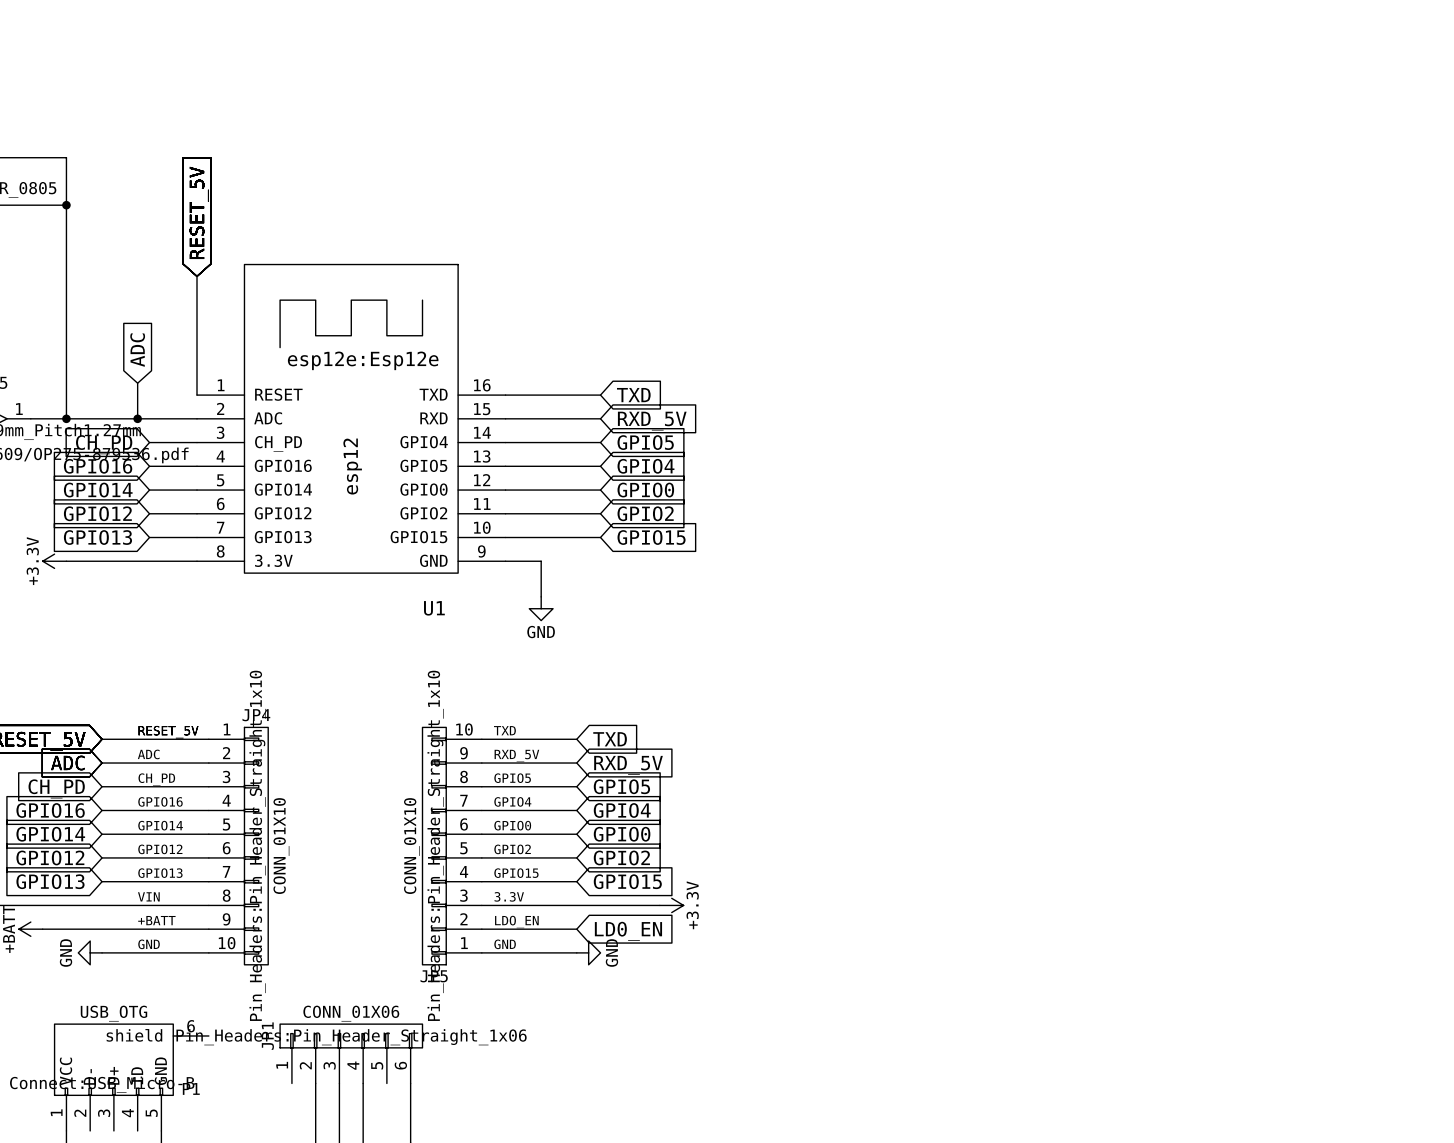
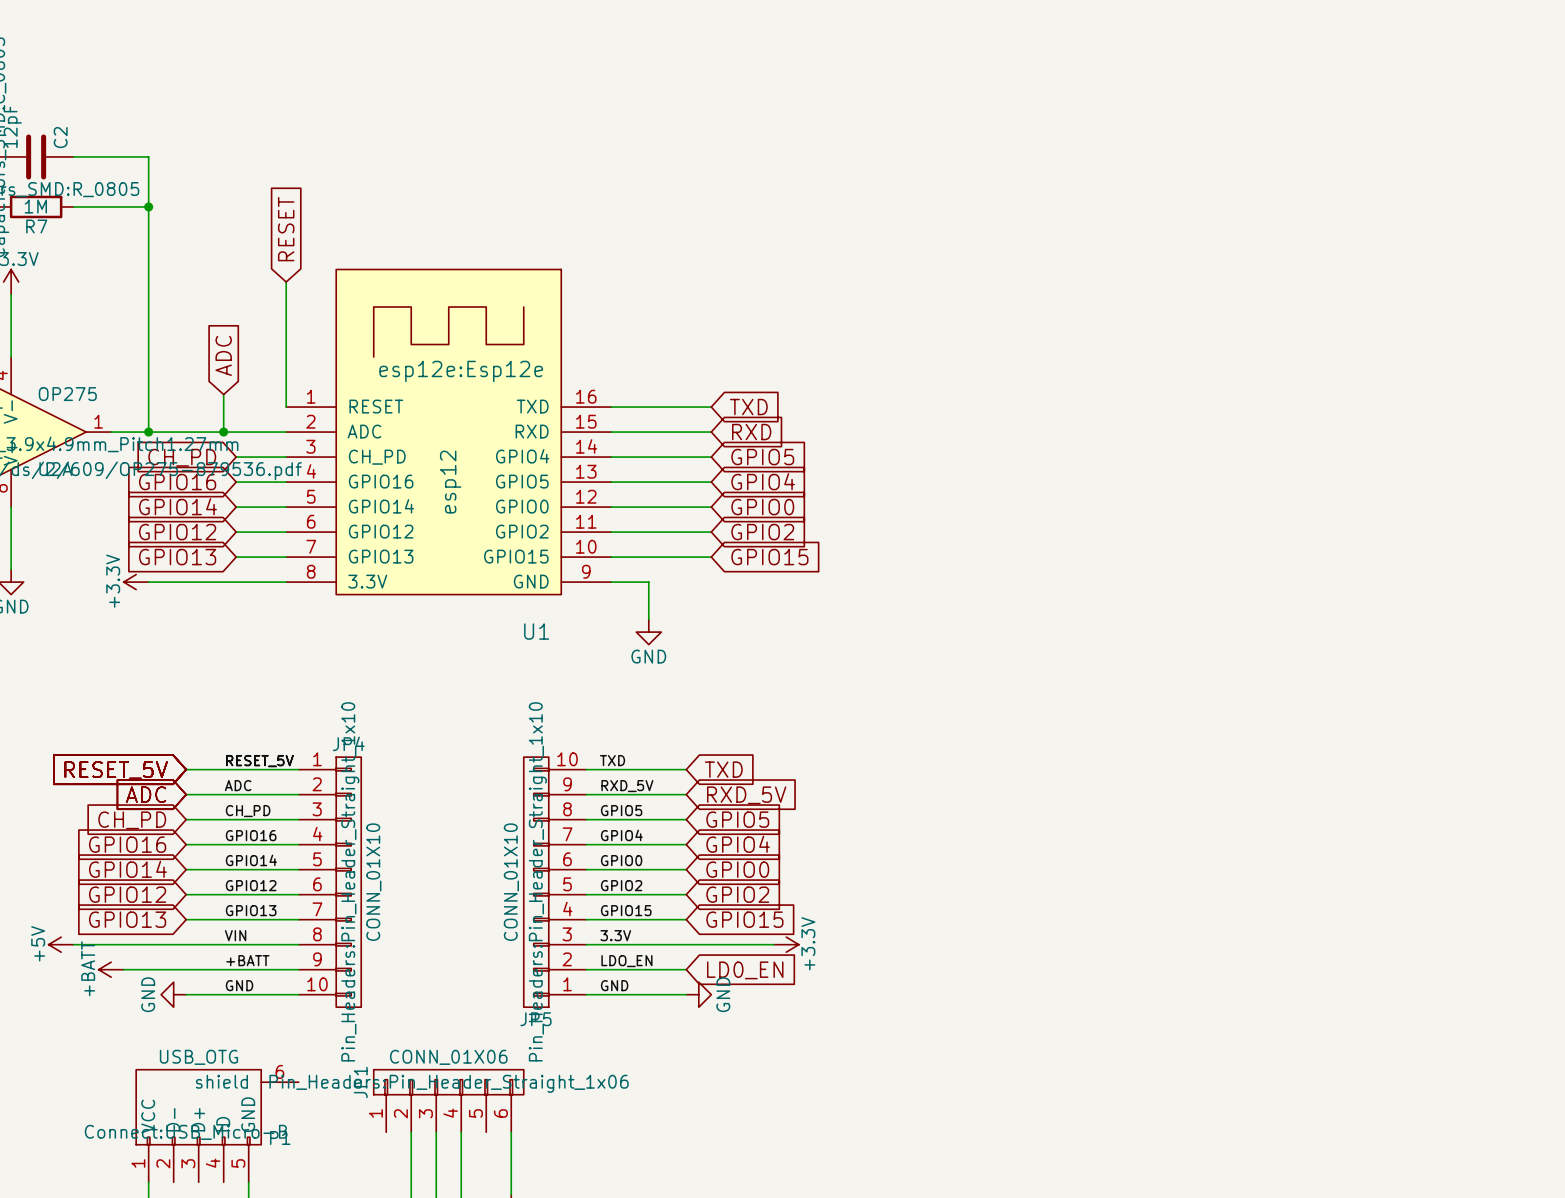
global label: RESET_5V (199, 212) -> RESET (286, 229)
global label: RXD_5V (652, 421) -> RXD (751, 432)

